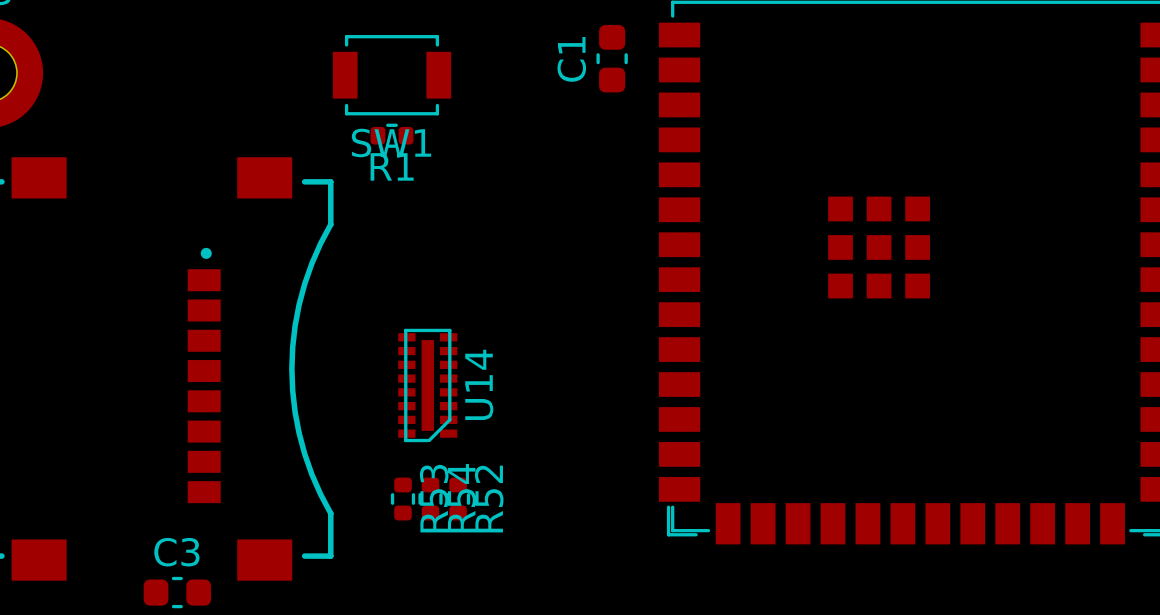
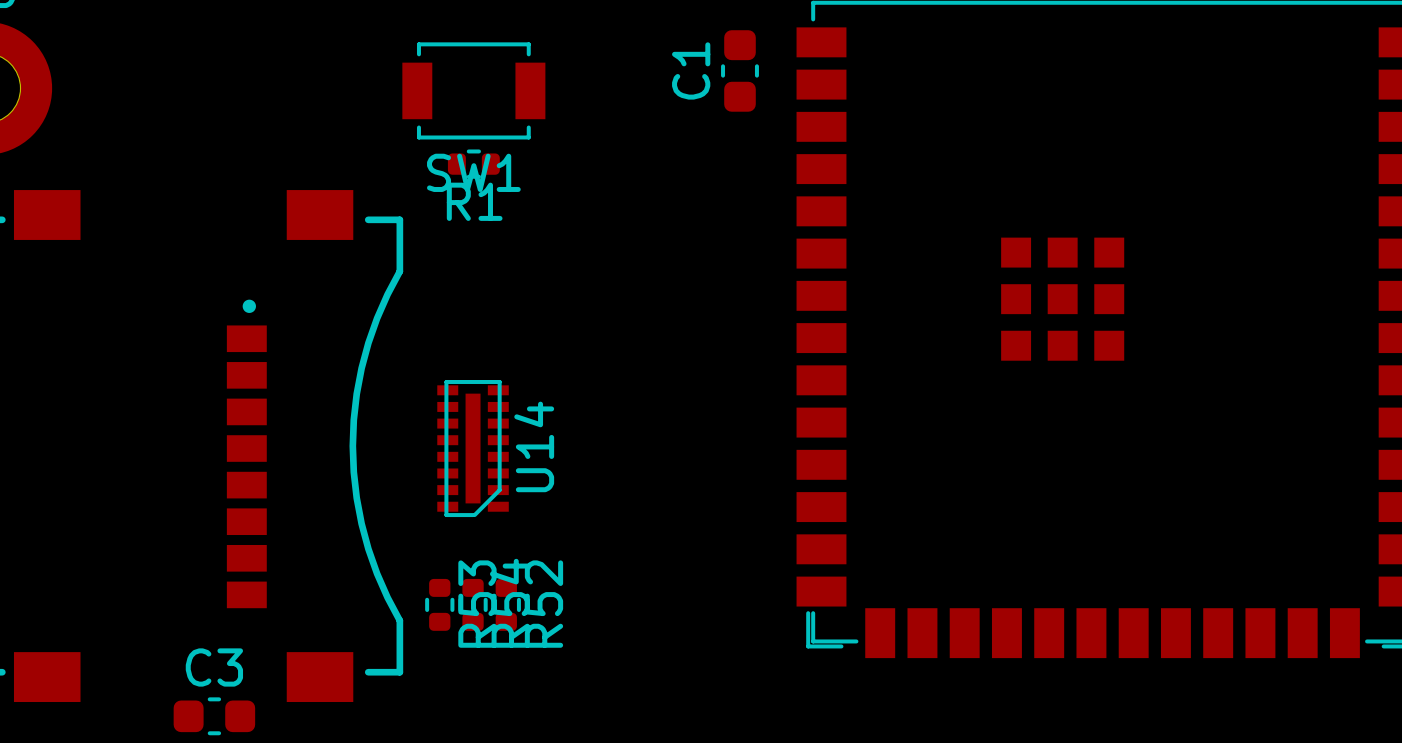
U14 position: (427, 385) -> (473, 448)
R53 position: (403, 498) -> (439, 604)
R54 position: (430, 498) -> (473, 604)
R52 position: (458, 498) -> (506, 604)

